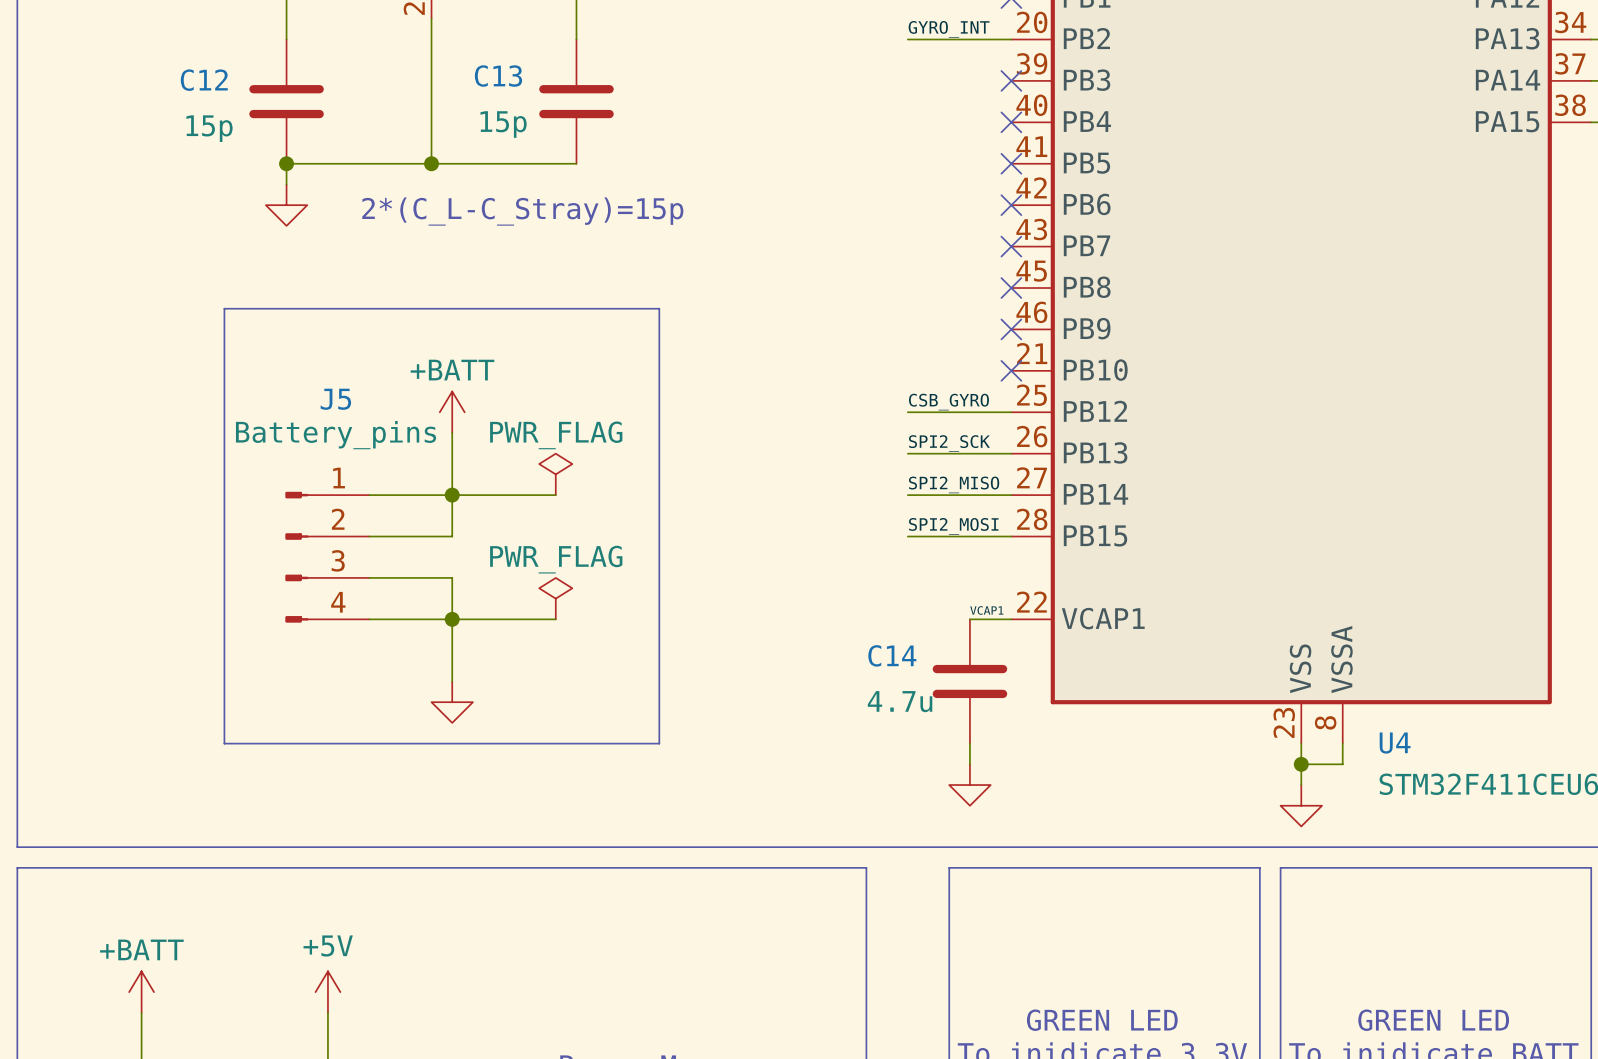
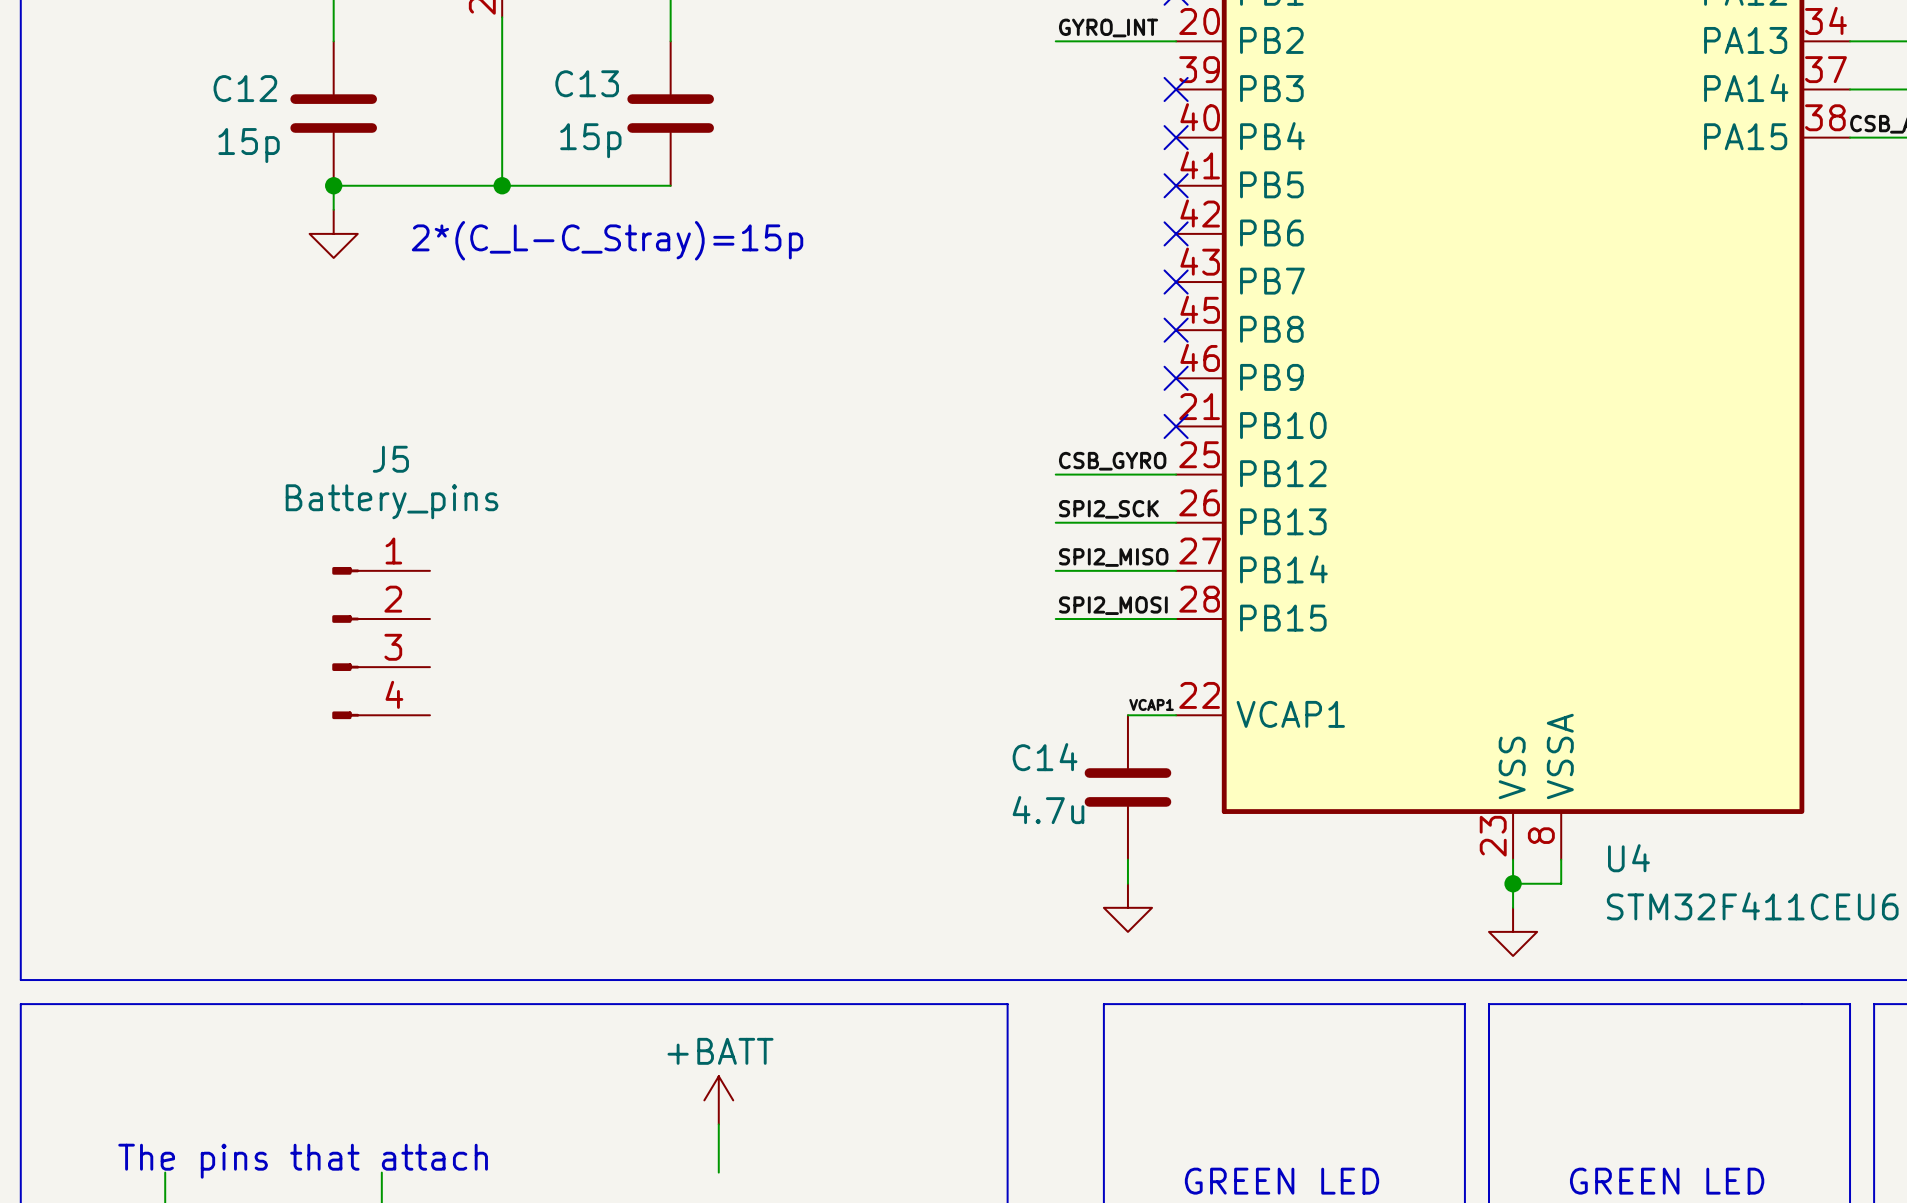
line: (224, 308) (659, 308) (659, 743) (224, 743) (224, 308) -> none
power symbol: +BATT (452, 412) -> none
wire: (452, 432) (452, 536) (369, 536) -> none
power symbol: PWR_FLAG (555, 474) -> none
wire: (369, 495) (555, 495) -> none
junction: (452, 495) -> none
wire: (369, 577) (452, 577) (452, 681) -> none
power symbol: PWR_FLAG (555, 598) -> none
wire: (369, 619) (555, 619) -> none
junction: (452, 619) -> none
power symbol: (452, 702) -> none
power symbol: none -> +BATT (718, 1100)
wire: none -> (718, 1124) (718, 1172)
power symbol: +BATT (141, 992) -> none
power symbol: +5V (327, 992) -> none
text: none -> The pins that attach (303, 1161)

